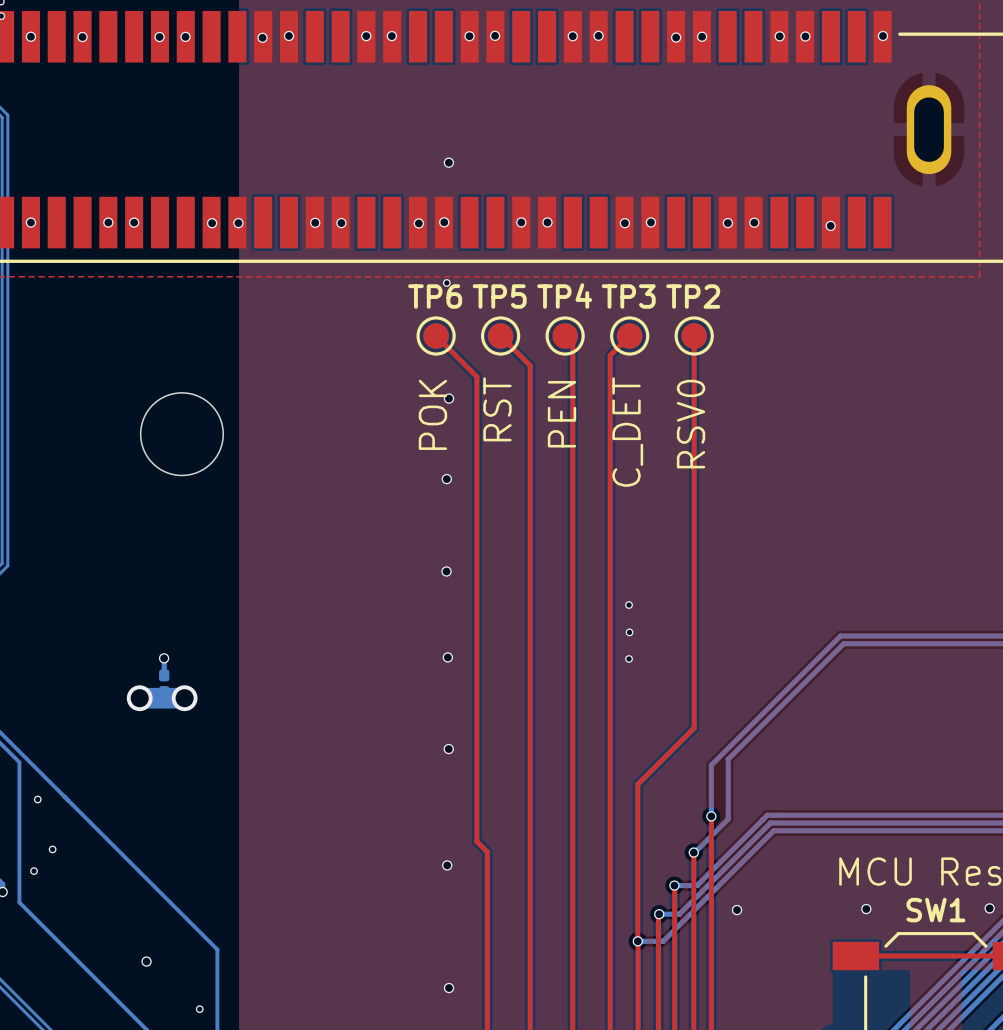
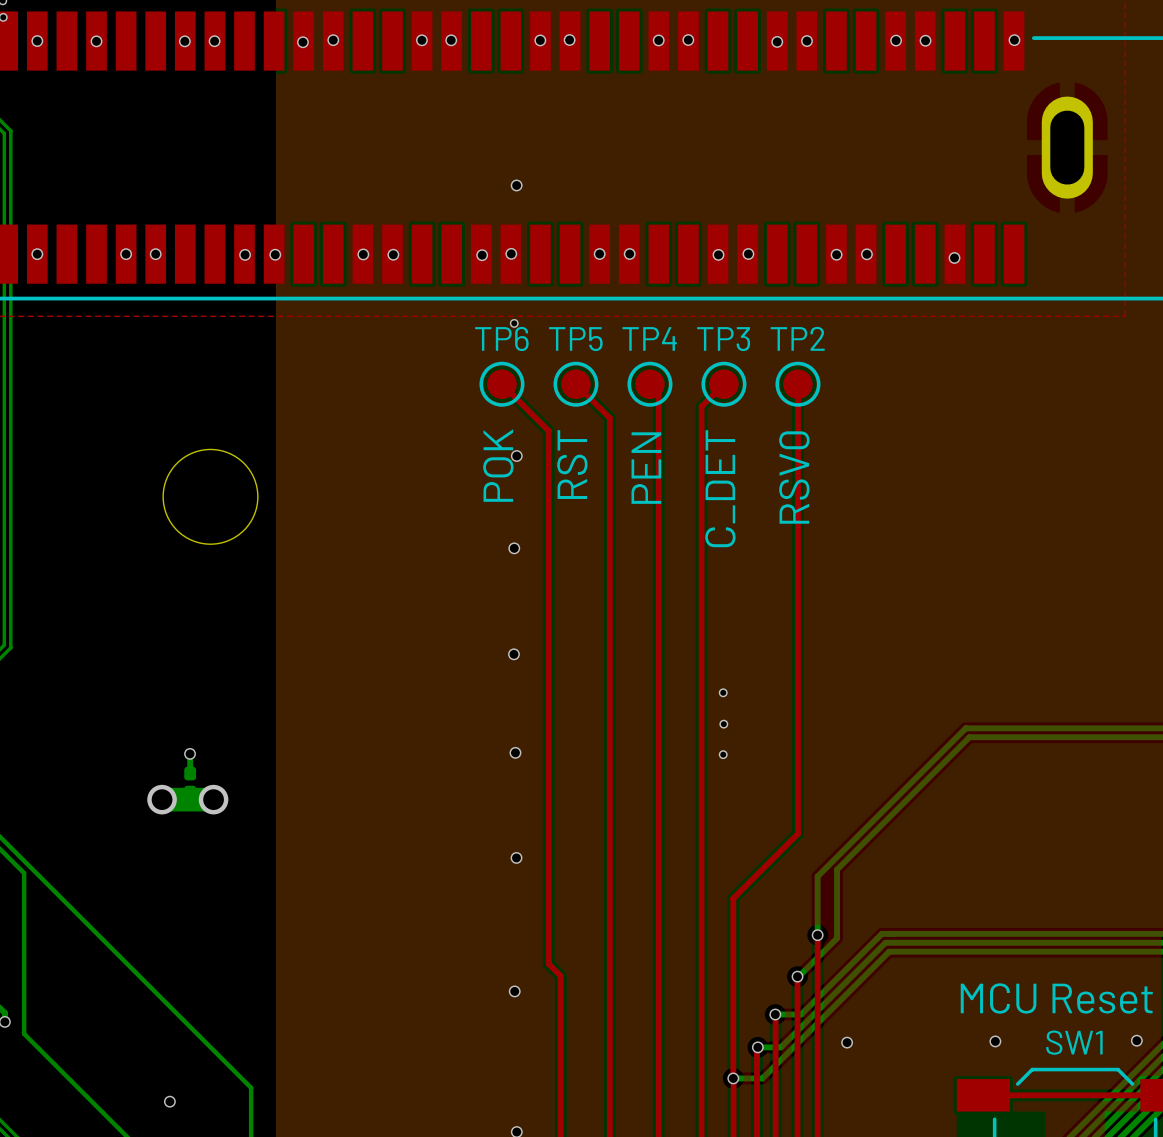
via: (37, 799) -> none
via: (52, 849) -> none
via: (34, 871) -> none

